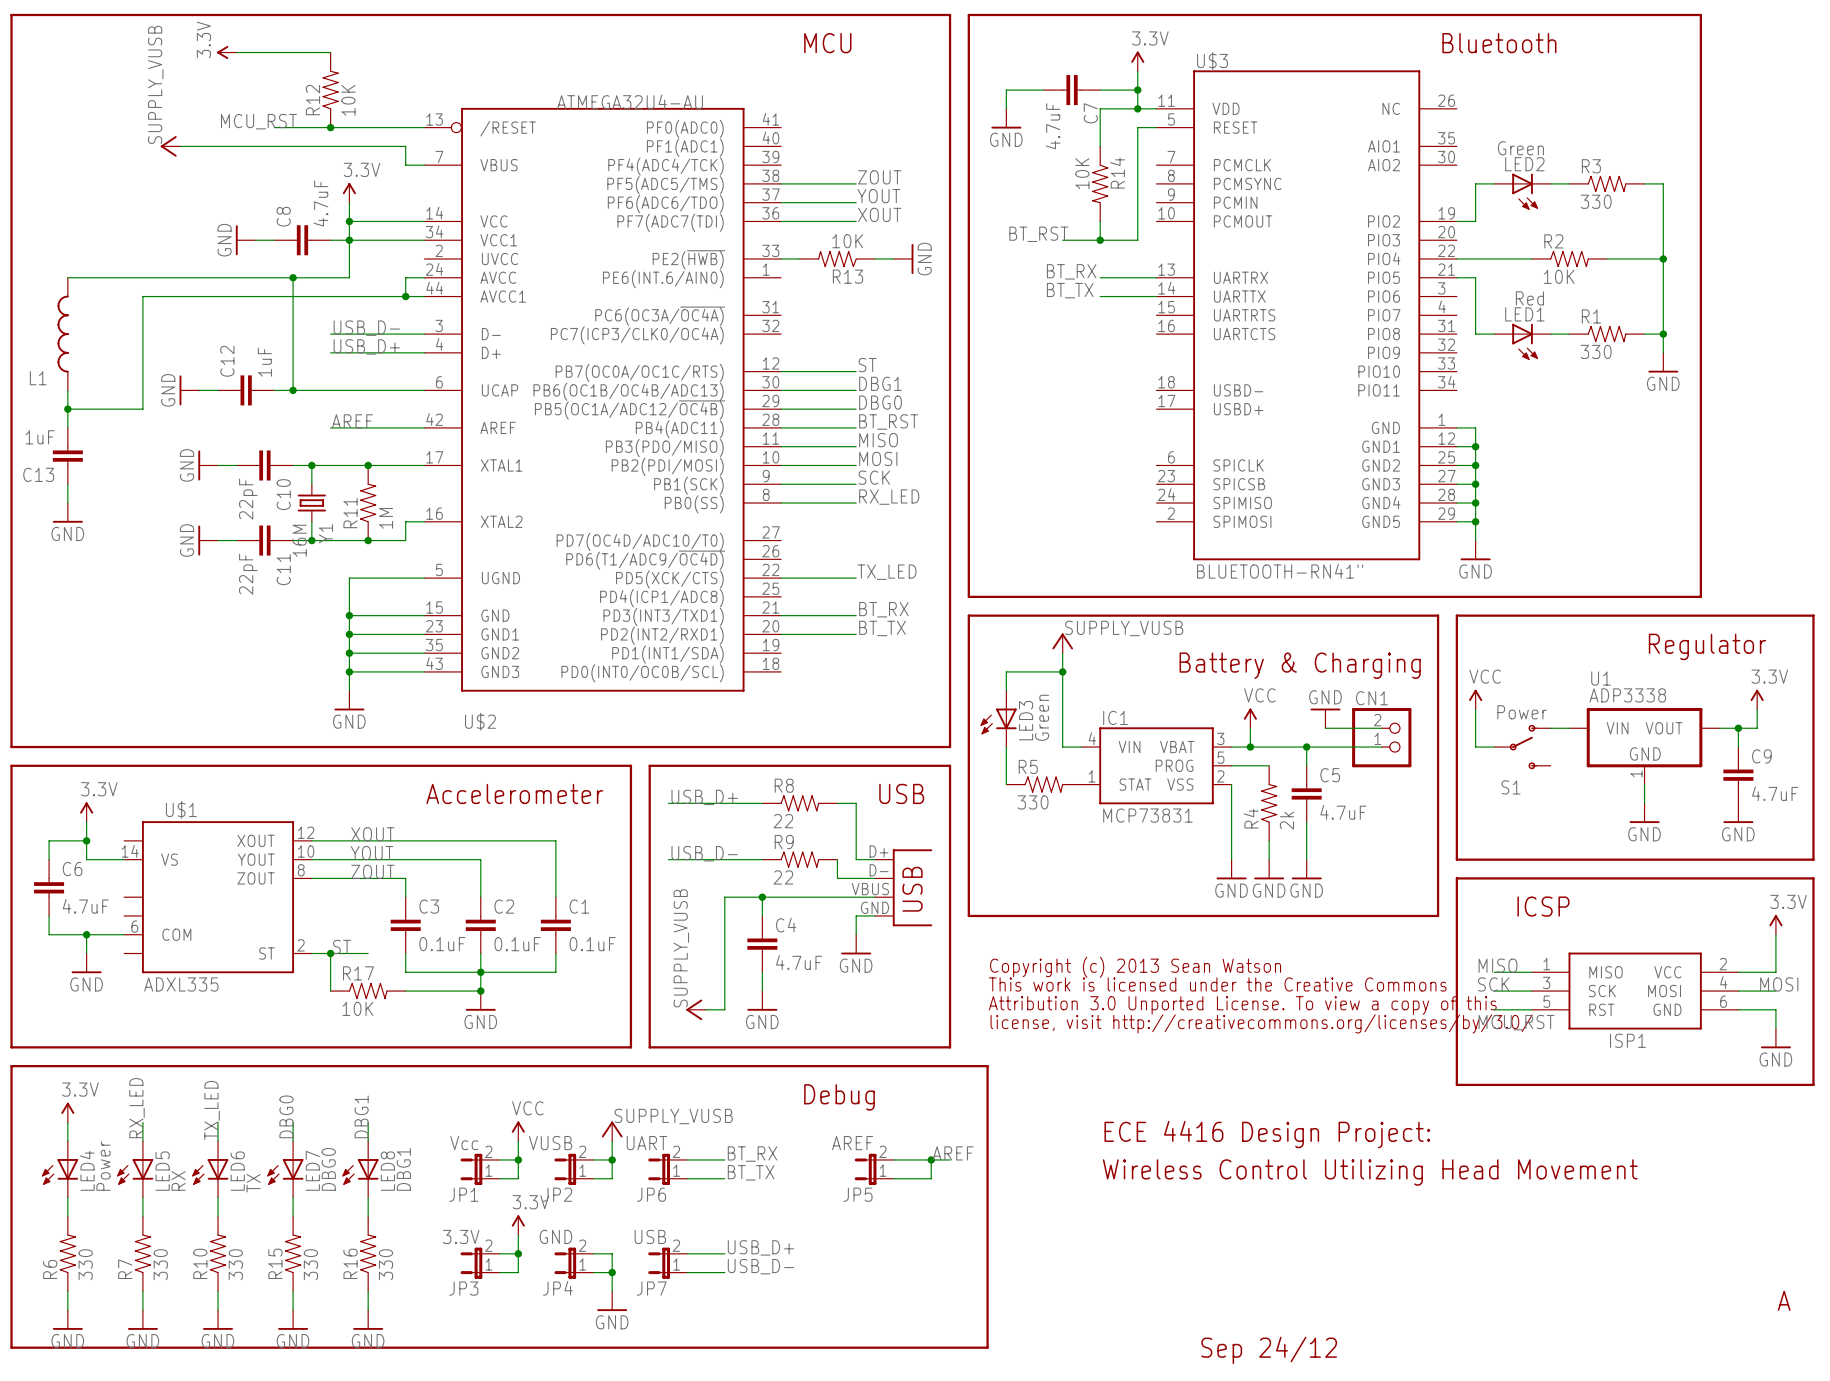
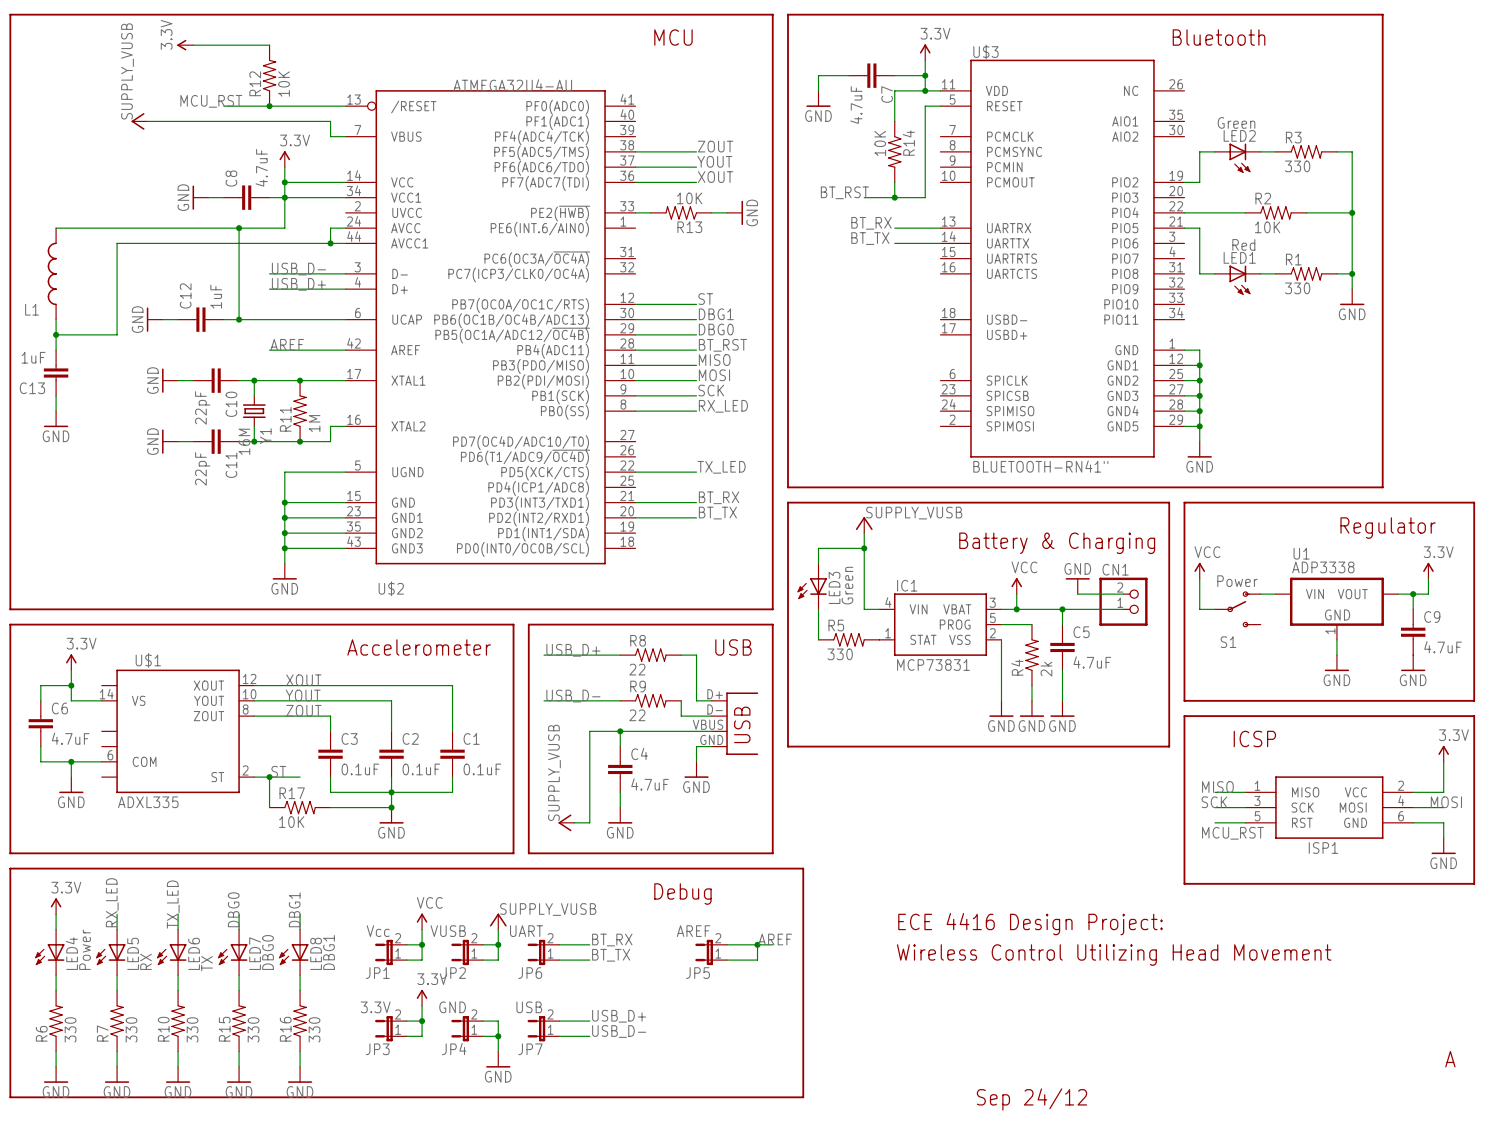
text: Copyright (c) 2013 Sean Watson (1135, 967) -> none
text: This work is licensed under the Creative Commons (1217, 984) -> none
text: Attribution 3.0 Unported License. To view a copy of this (1242, 1005) -> none
text: license, visit http://creativecommons.org/licenses/by/3.0/ (1261, 1023) -> none

